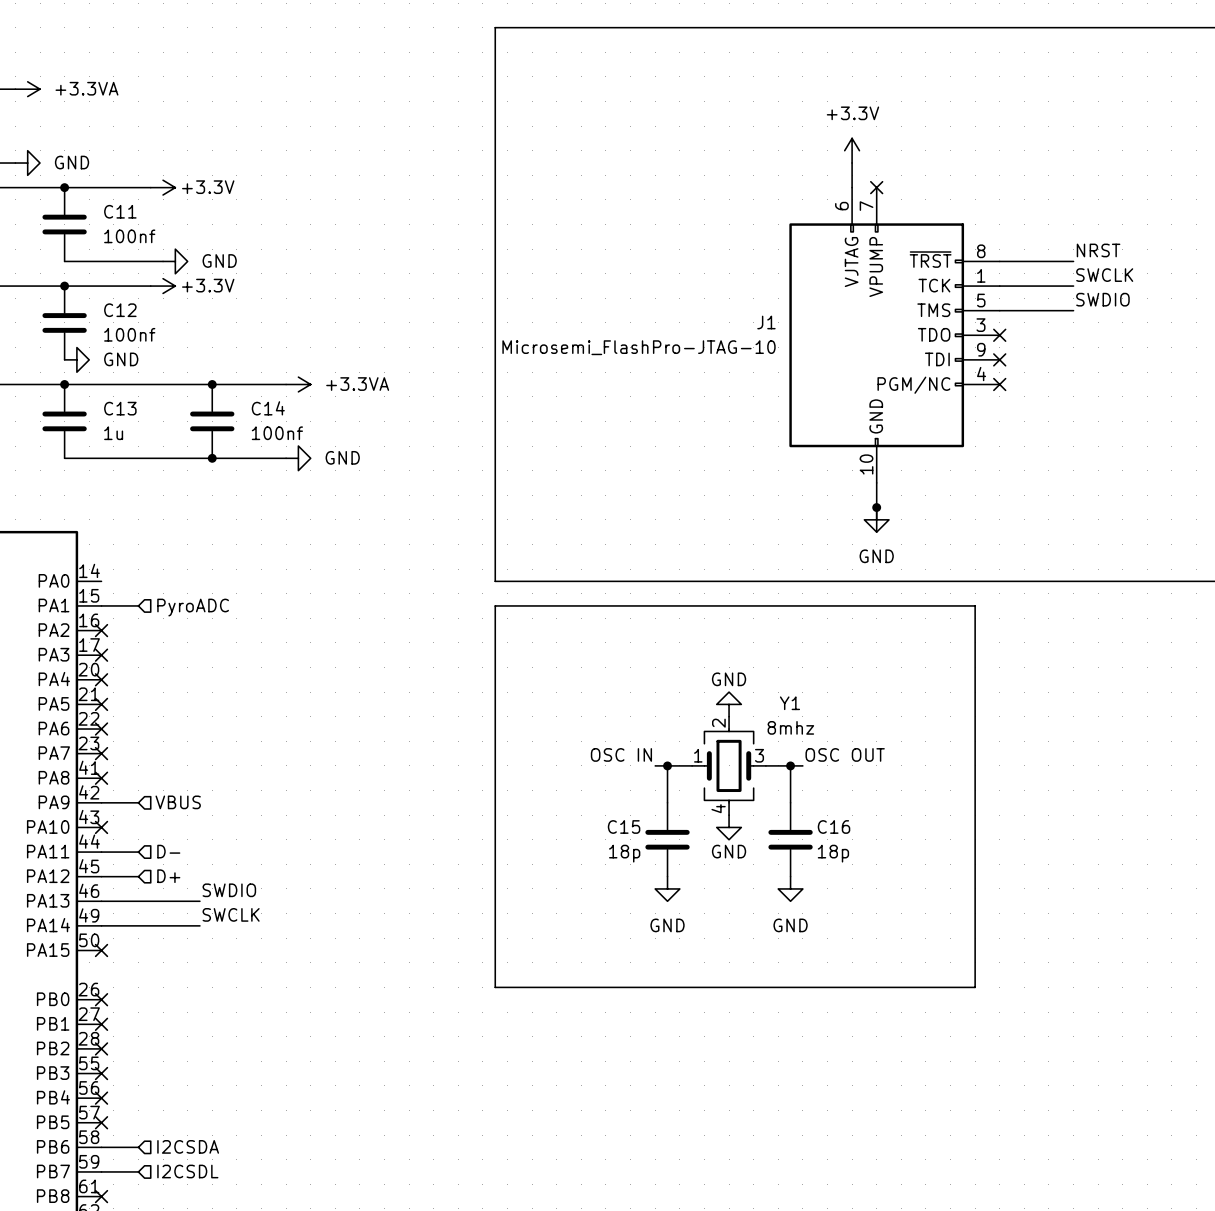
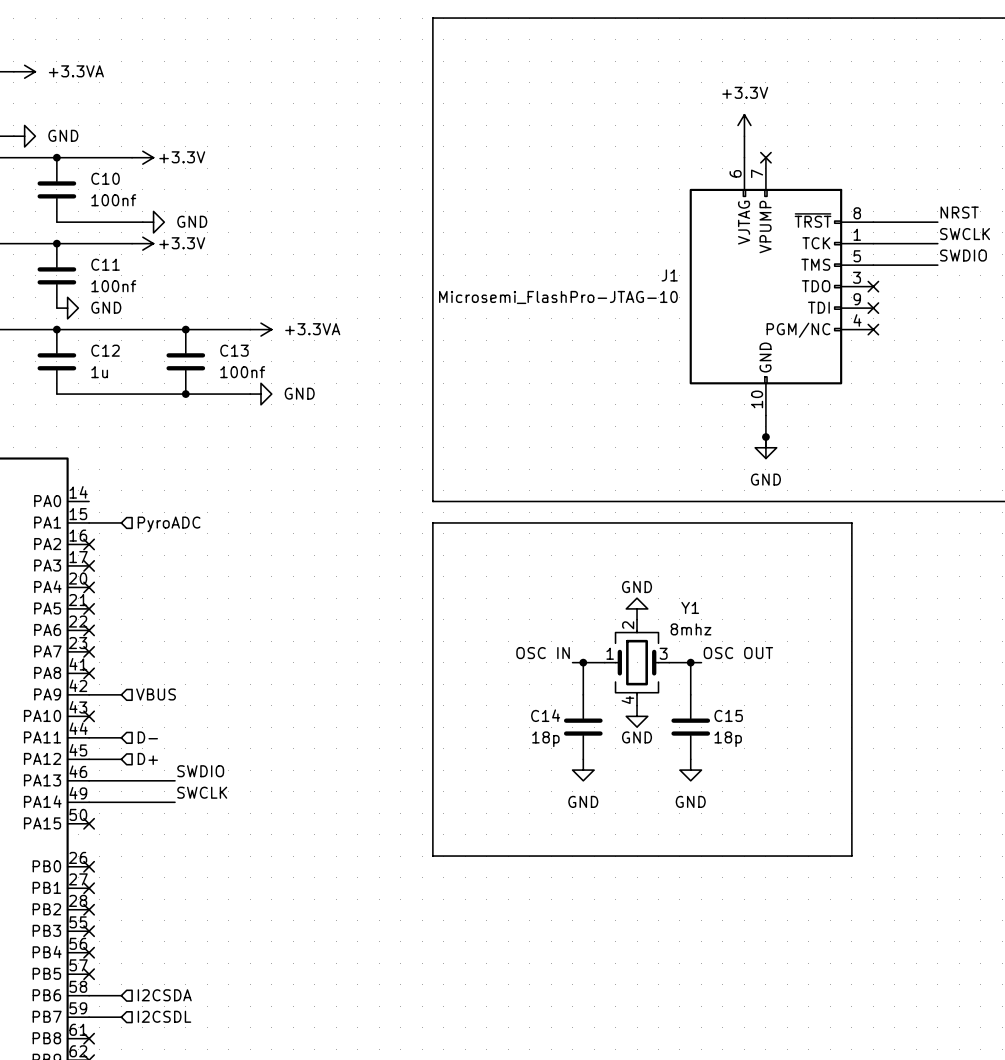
C11 name: C11 (120, 211) -> C10 (105, 178)
C12 name: C12 (120, 310) -> C11 (105, 264)
C13 name: C13 (120, 408) -> C12 (105, 350)
C14 name: C14 (268, 408) -> C13 (234, 350)
C15 name: C15 (624, 826) -> C14 (545, 715)
C16 name: C16 (834, 826) -> C15 (728, 715)

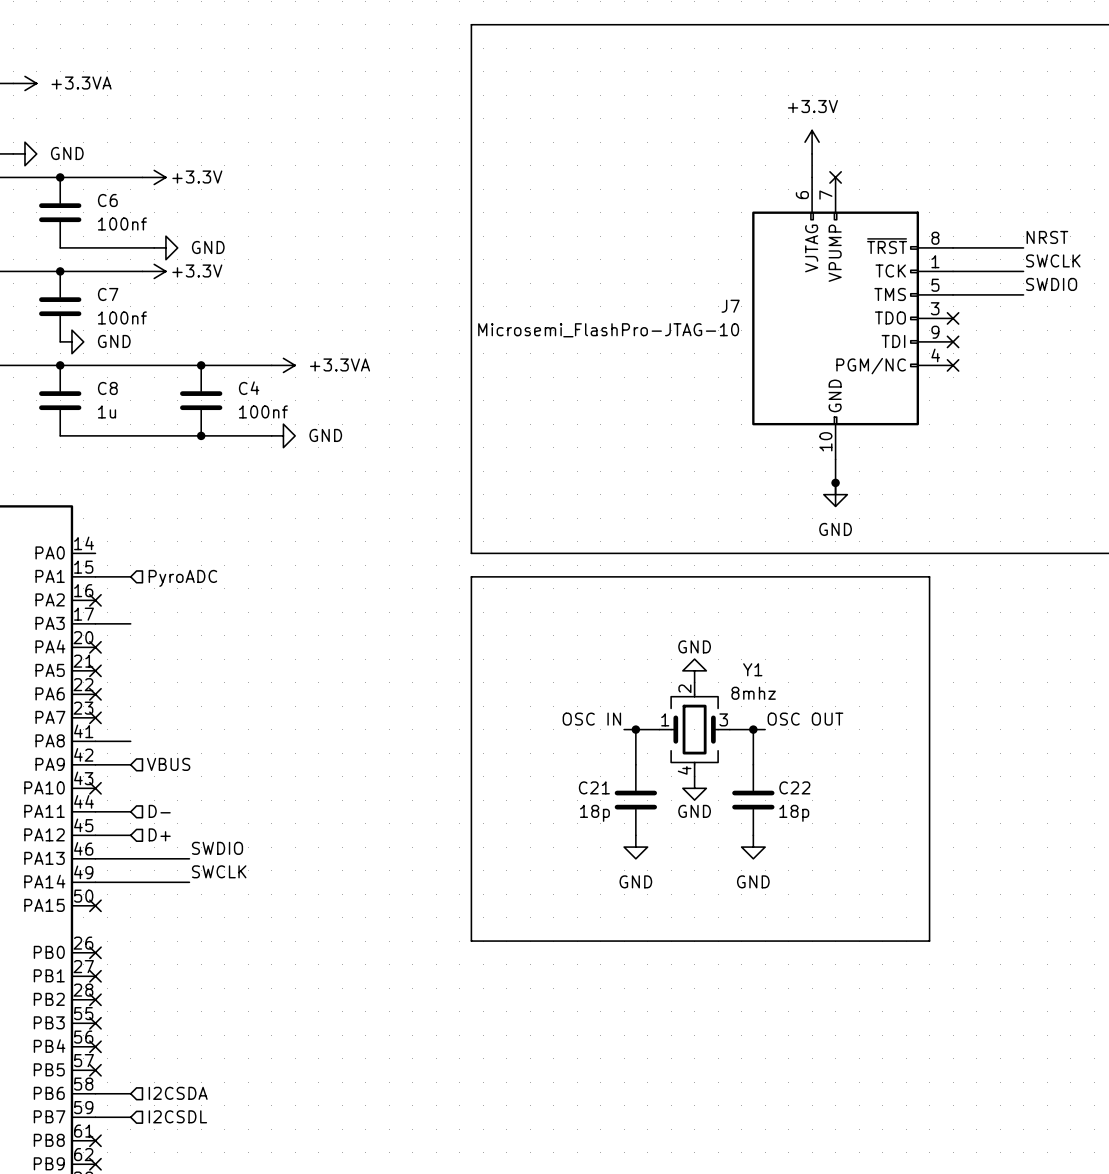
C10 name: C10 (105, 178) -> C6 (107, 200)
C11 name: C11 (105, 264) -> C7 (108, 294)
J1 name: J1 (669, 275) -> J7 (730, 306)
C12 name: C12 (105, 350) -> C8 (107, 388)
C13 name: C13 (234, 350) -> C4 (249, 388)
wire: none -> (95, 623) (130, 623)
no-connect mark: (89, 565) -> none
wire: none -> (95, 741) (130, 741)
no-connect mark: (89, 673) -> none
C14 name: C14 (545, 715) -> C21 (594, 787)
C15 name: C15 (728, 715) -> C22 (794, 787)

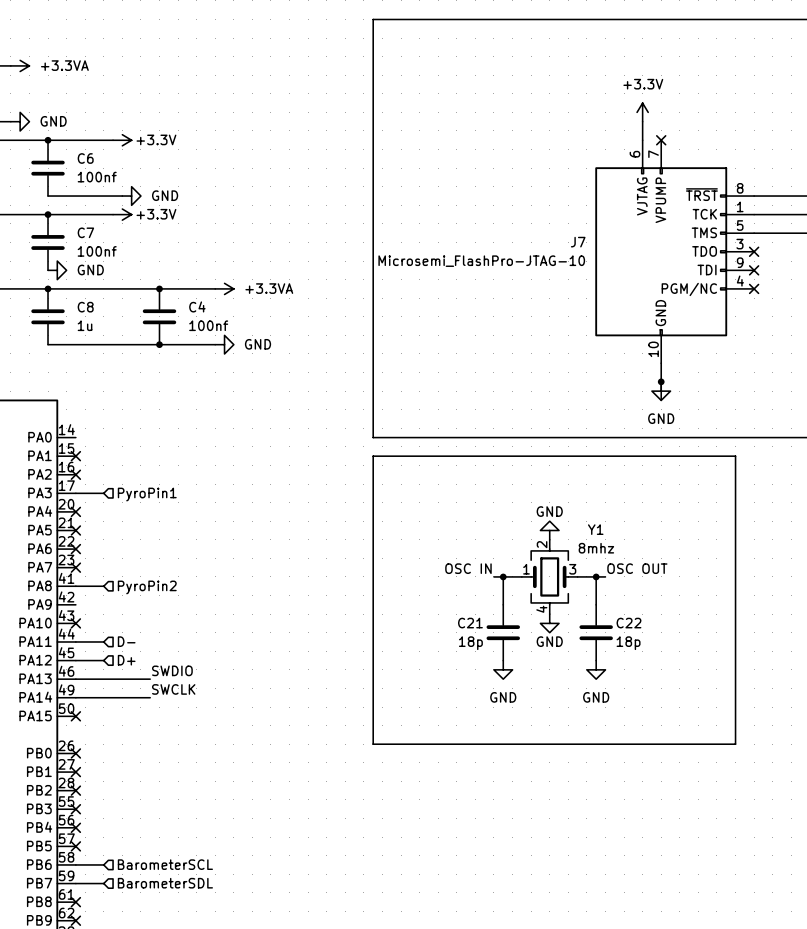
wire: (95, 576) (130, 576) -> none
no-connect mark: none -> (75, 456)
hierarchical label: PyroADC (182, 578) -> none
hierarchical label: none -> PyroPin1 (147, 494)
hierarchical label: none -> PyroPin2 (147, 587)
wire: (95, 764) (130, 764) -> none
hierarchical label: VBUS (168, 764) -> none
hierarchical label: I2CSDA (178, 1093) -> BarometerSCL (165, 864)
hierarchical label: I2CSDL (177, 1116) -> BarometerSDL (165, 883)

